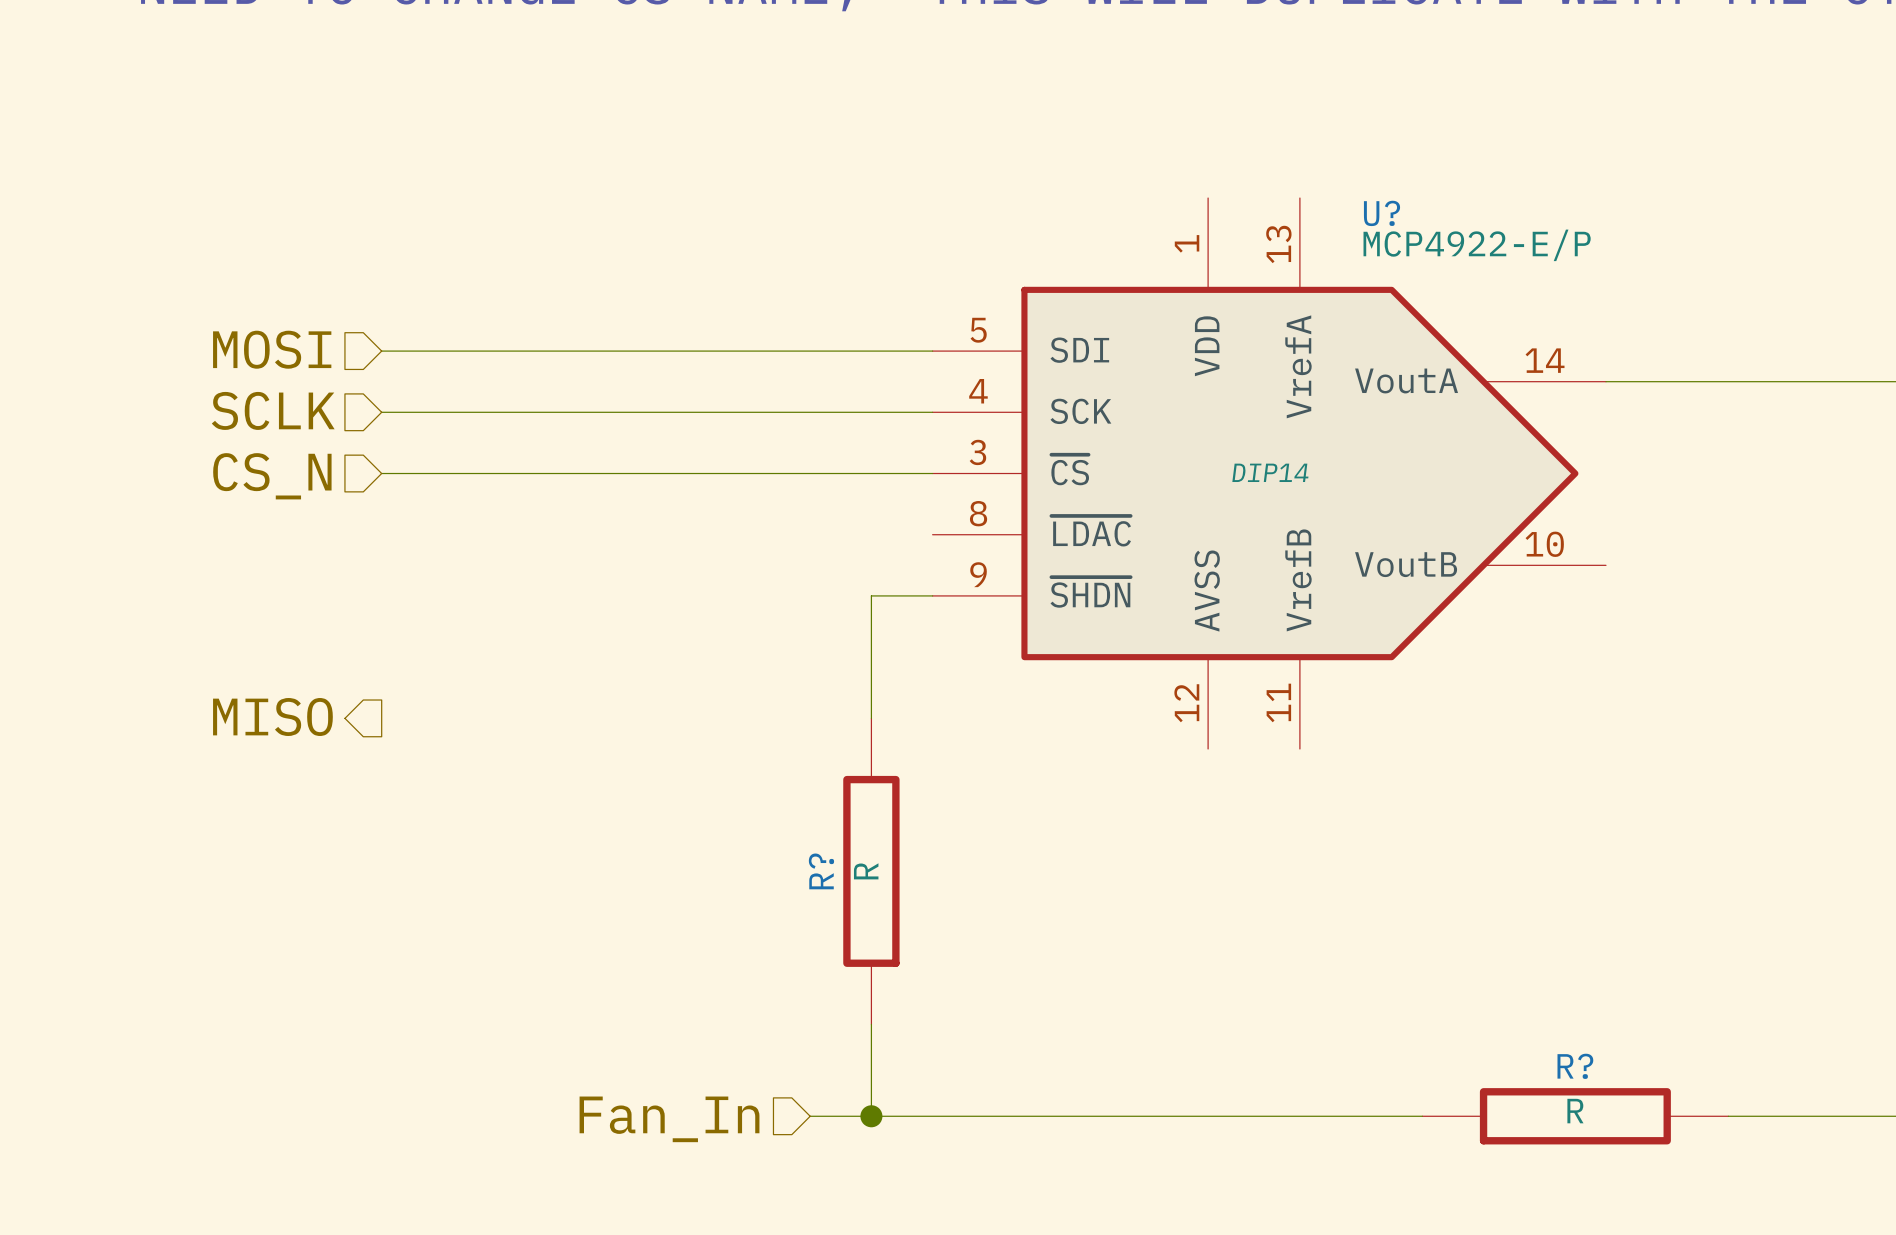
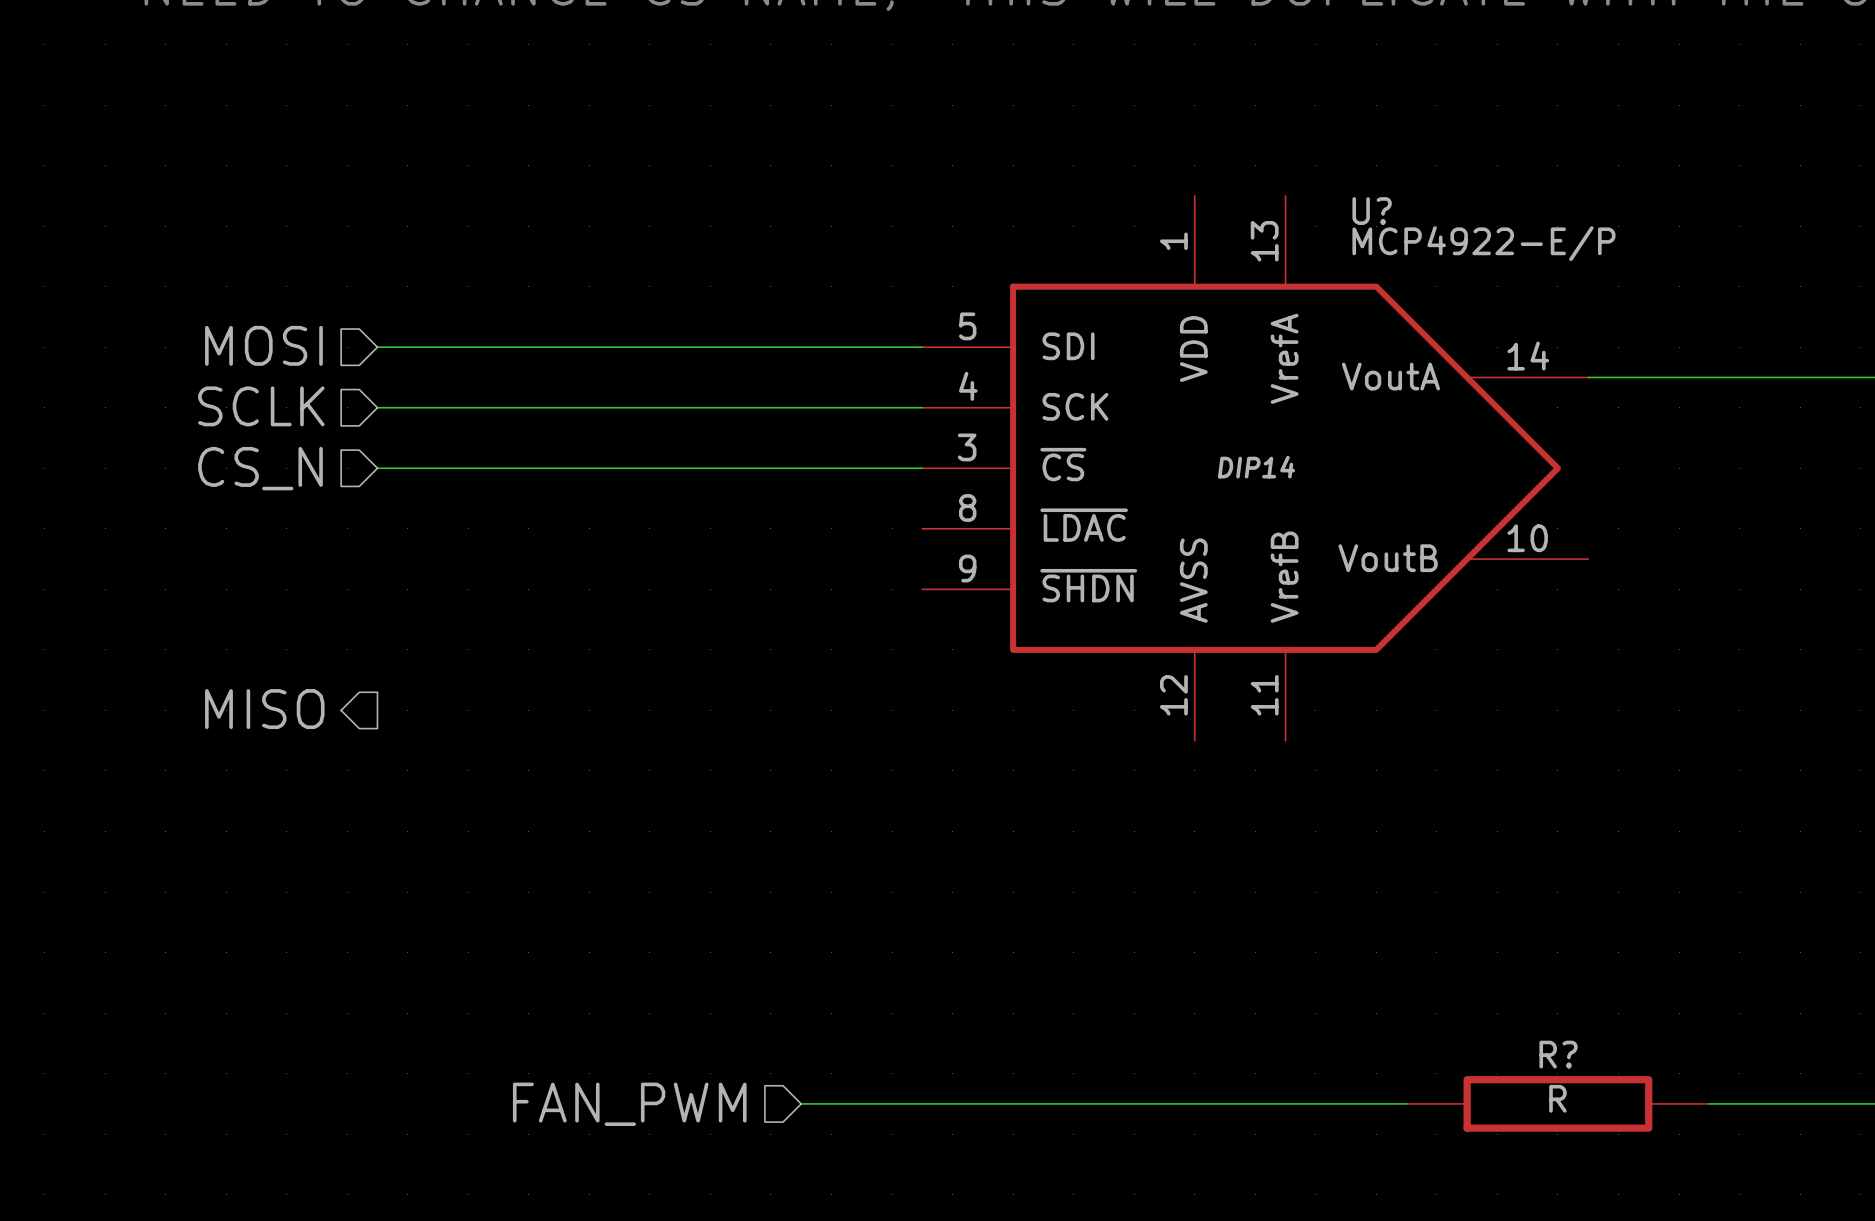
wire: (932, 595) (871, 595) (871, 718) -> none
R?: R (871, 871) -> none
wire: (871, 1024) (871, 1116) -> none
junction: (871, 1116) -> none
hierarchical label: Fan_In (669, 1119) -> FAN_PWM (629, 1104)

